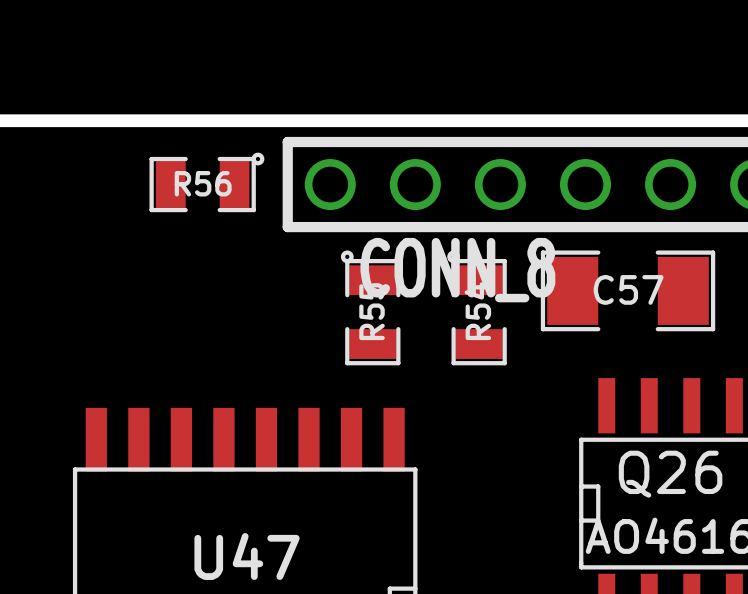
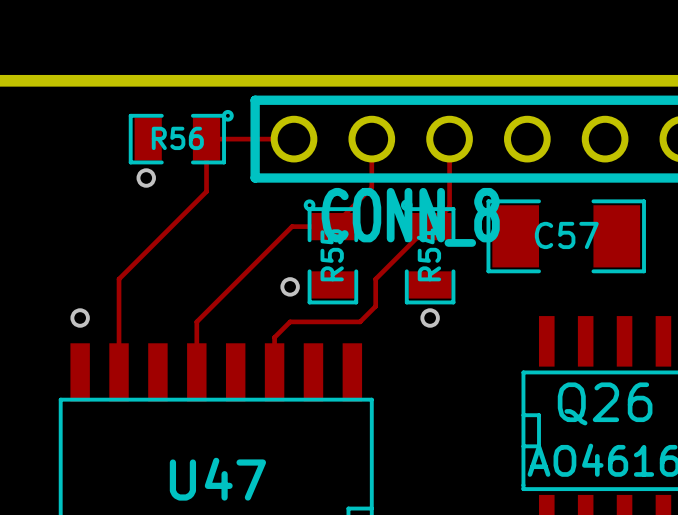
track: none -> (294, 139) (206, 139) (206, 191) (119, 279) (119, 372)
track: none -> (371, 139) (371, 187) (332, 226) (292, 226) (196, 321) (196, 372)
track: none -> (449, 139) (449, 207) (375, 279) (375, 306) (360, 321) (290, 321) (274, 337) (274, 372)
via: none -> (146, 178)
via: none -> (290, 286)
via: none -> (80, 318)
via: none -> (430, 318)

